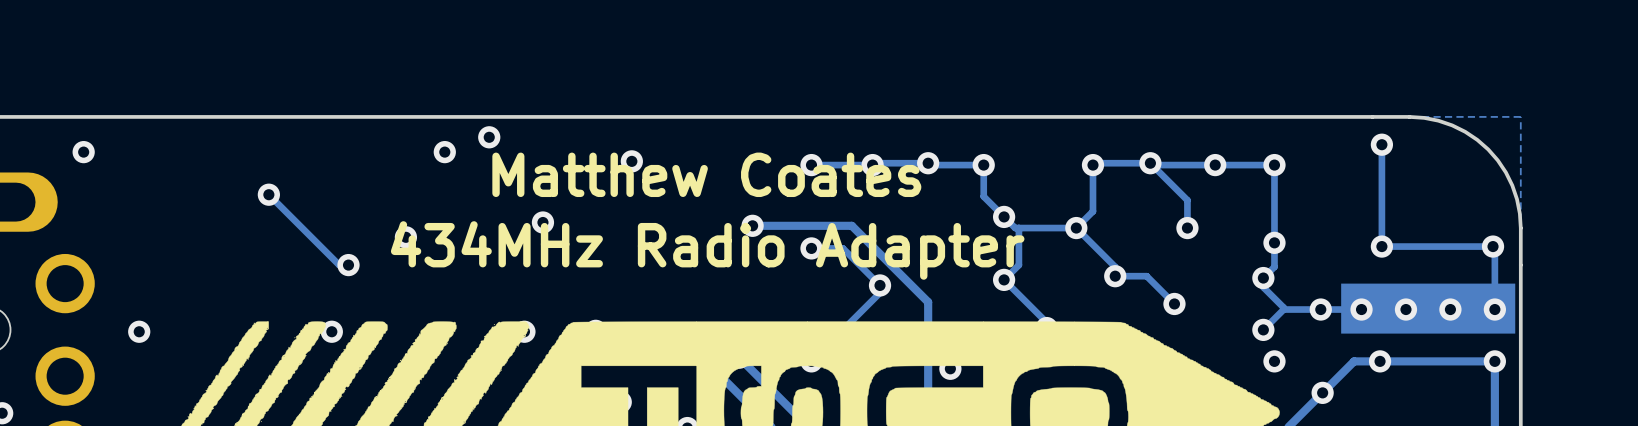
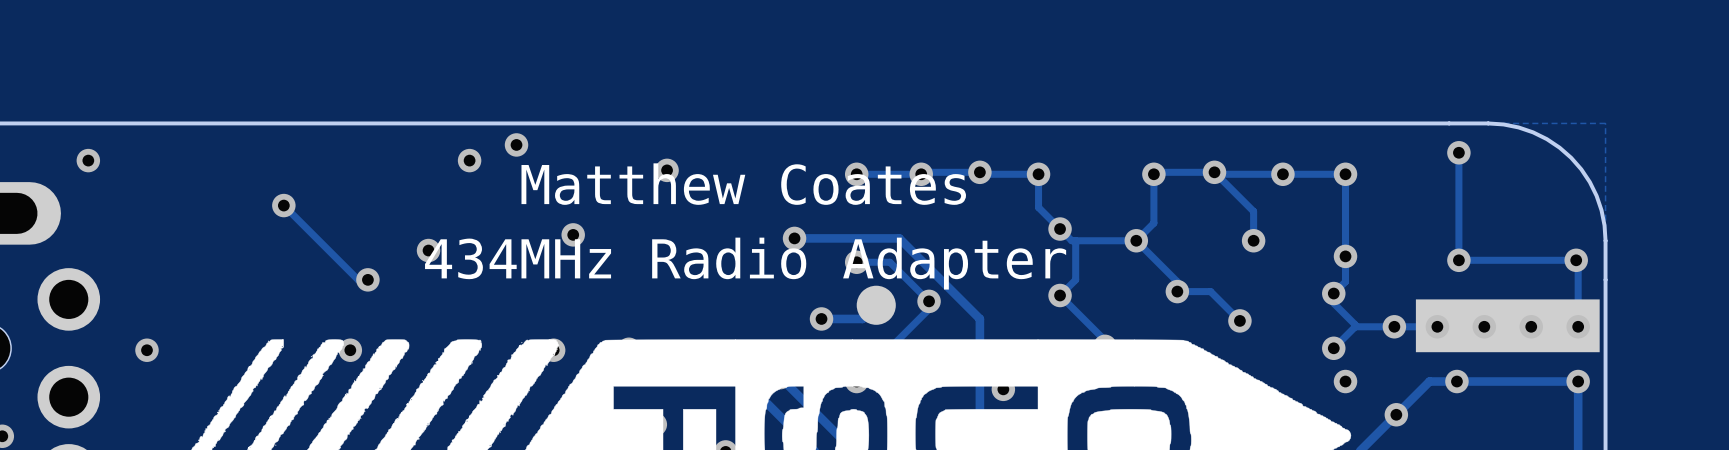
track: none -> (876, 305) (862, 318) (821, 318)
part: none -> (876, 305)
via: none -> (821, 318)

